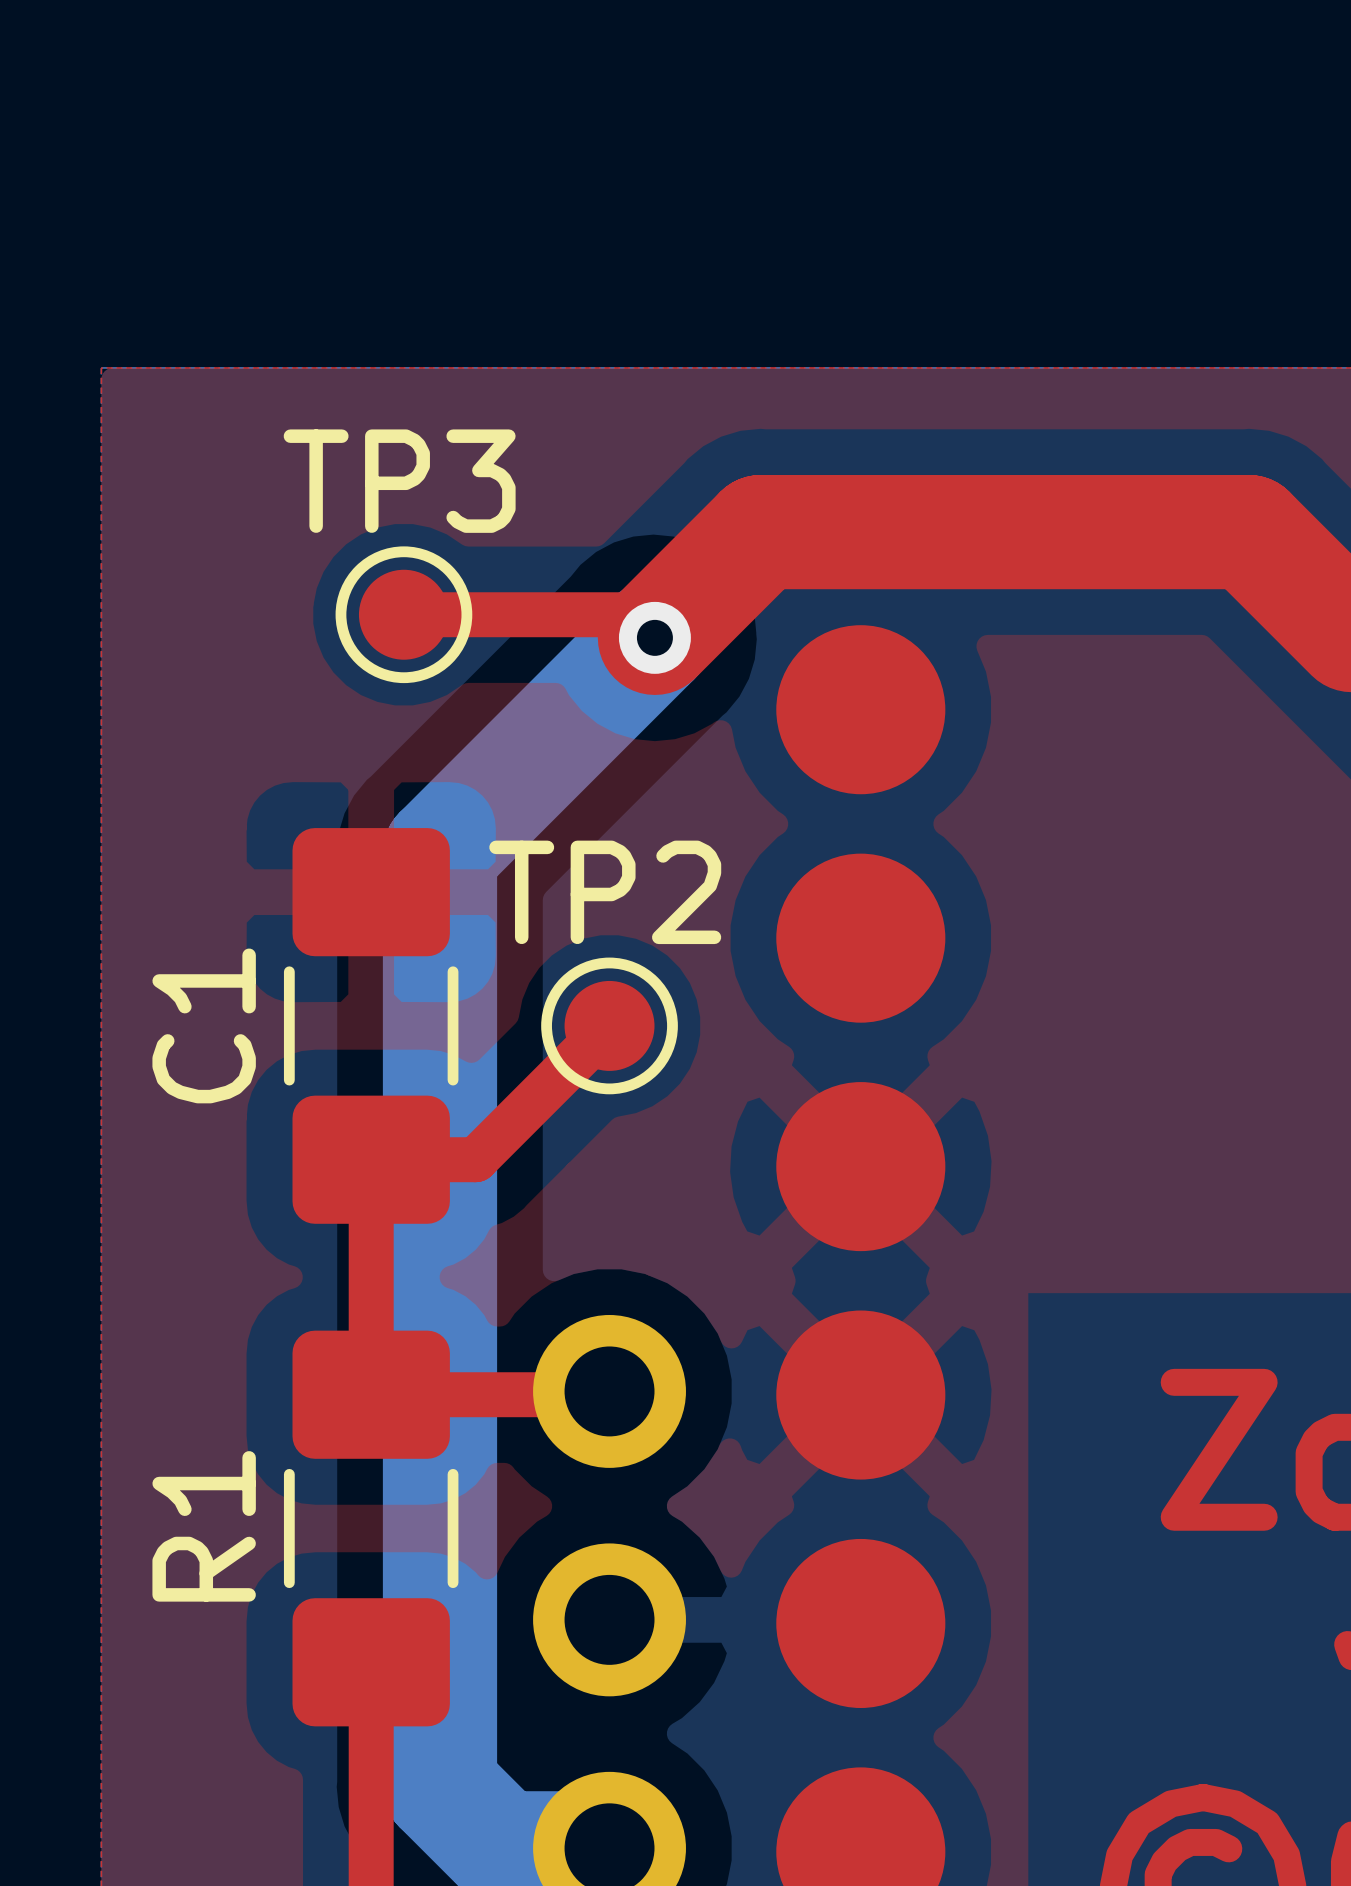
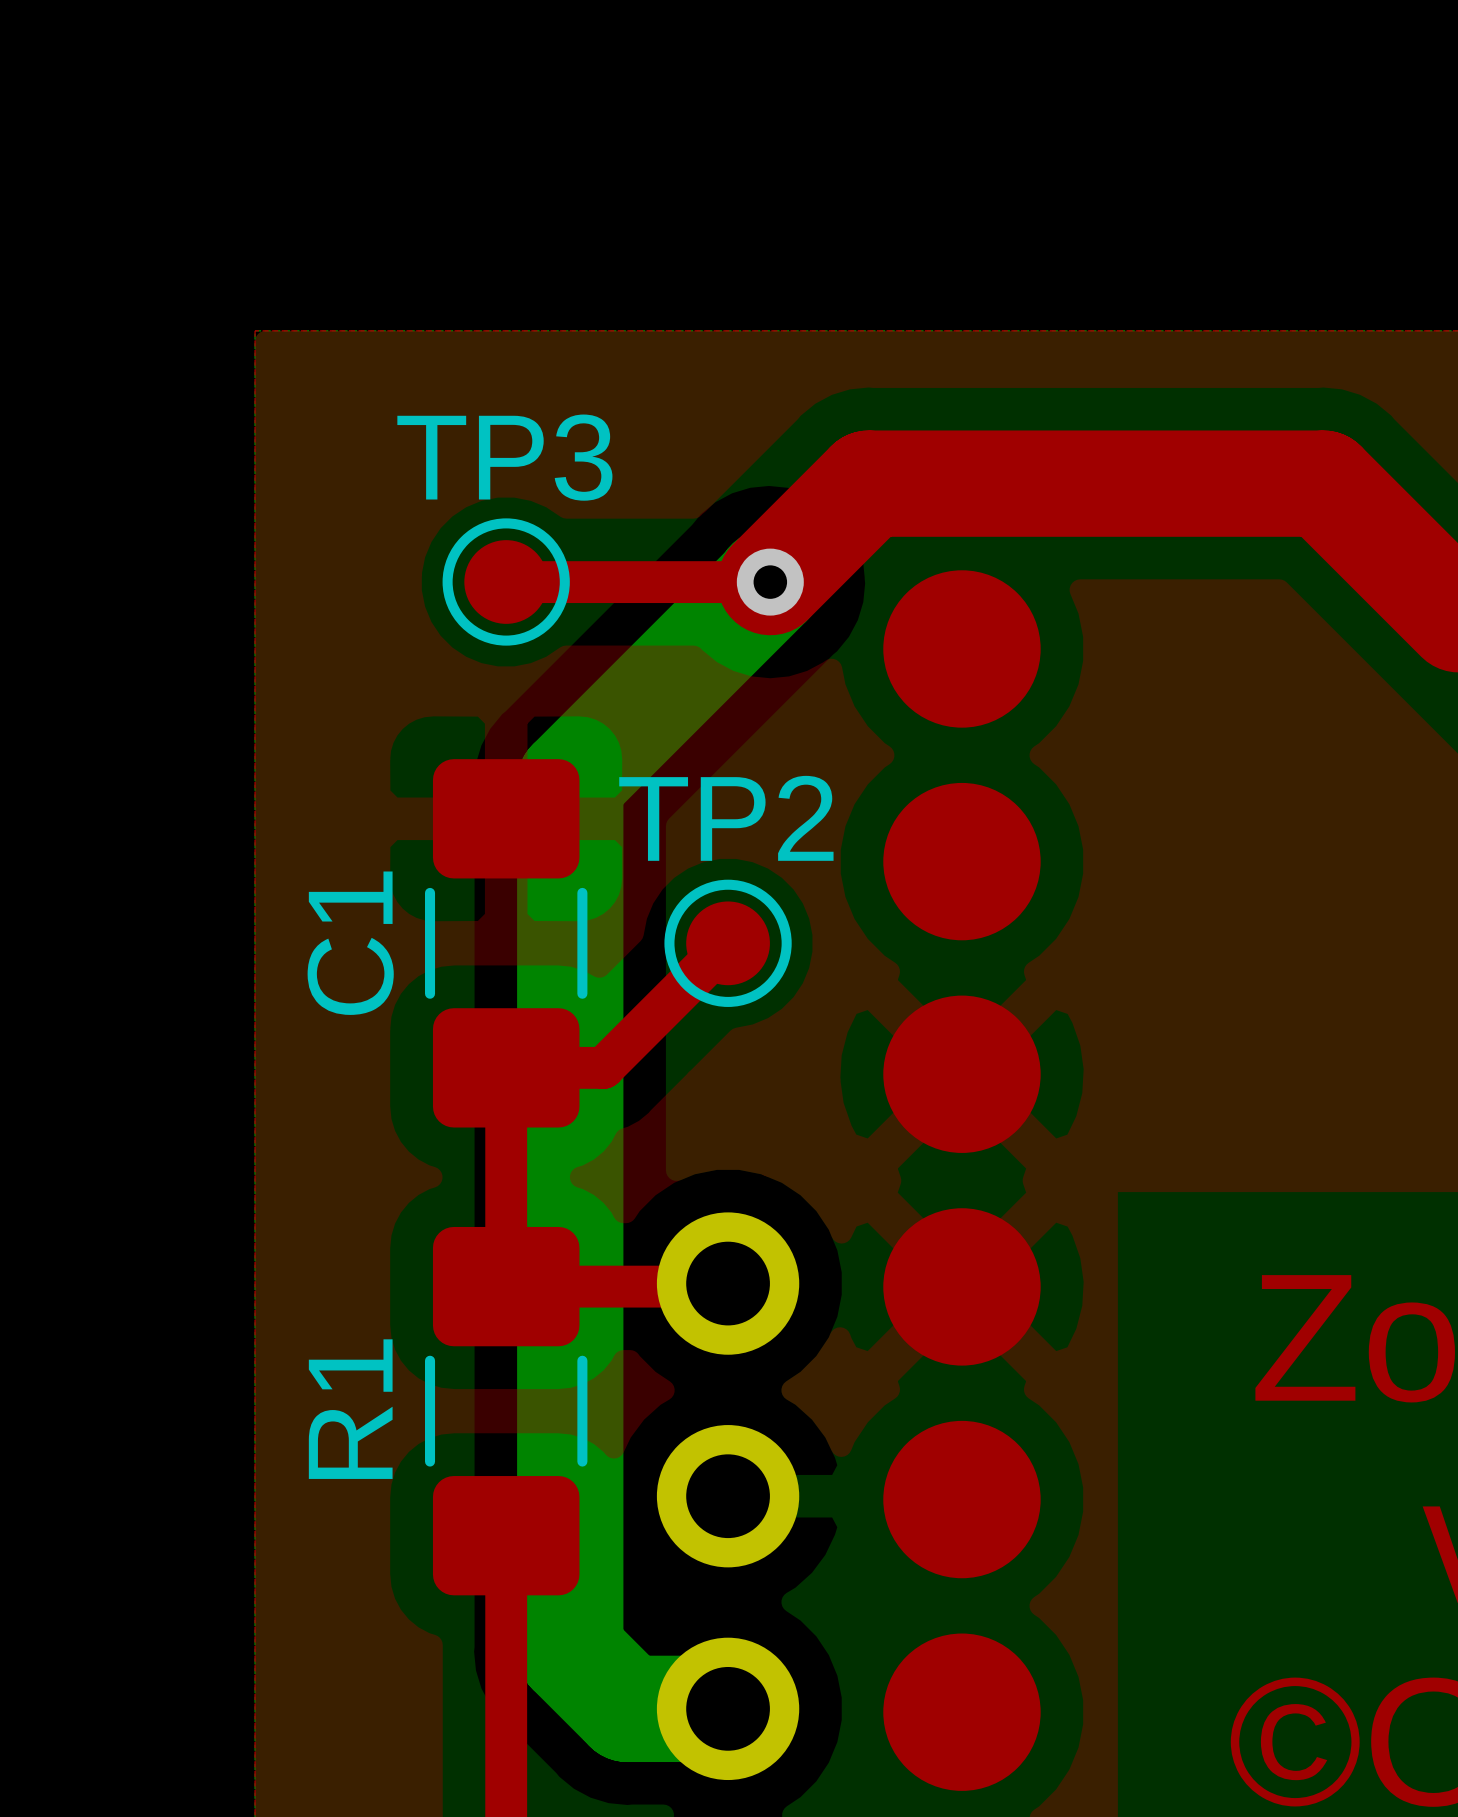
top track: (403, 614) (631, 614) -> none
TP3 position: (403, 614) -> (506, 582)
top track: none -> (506, 582) (770, 582)

